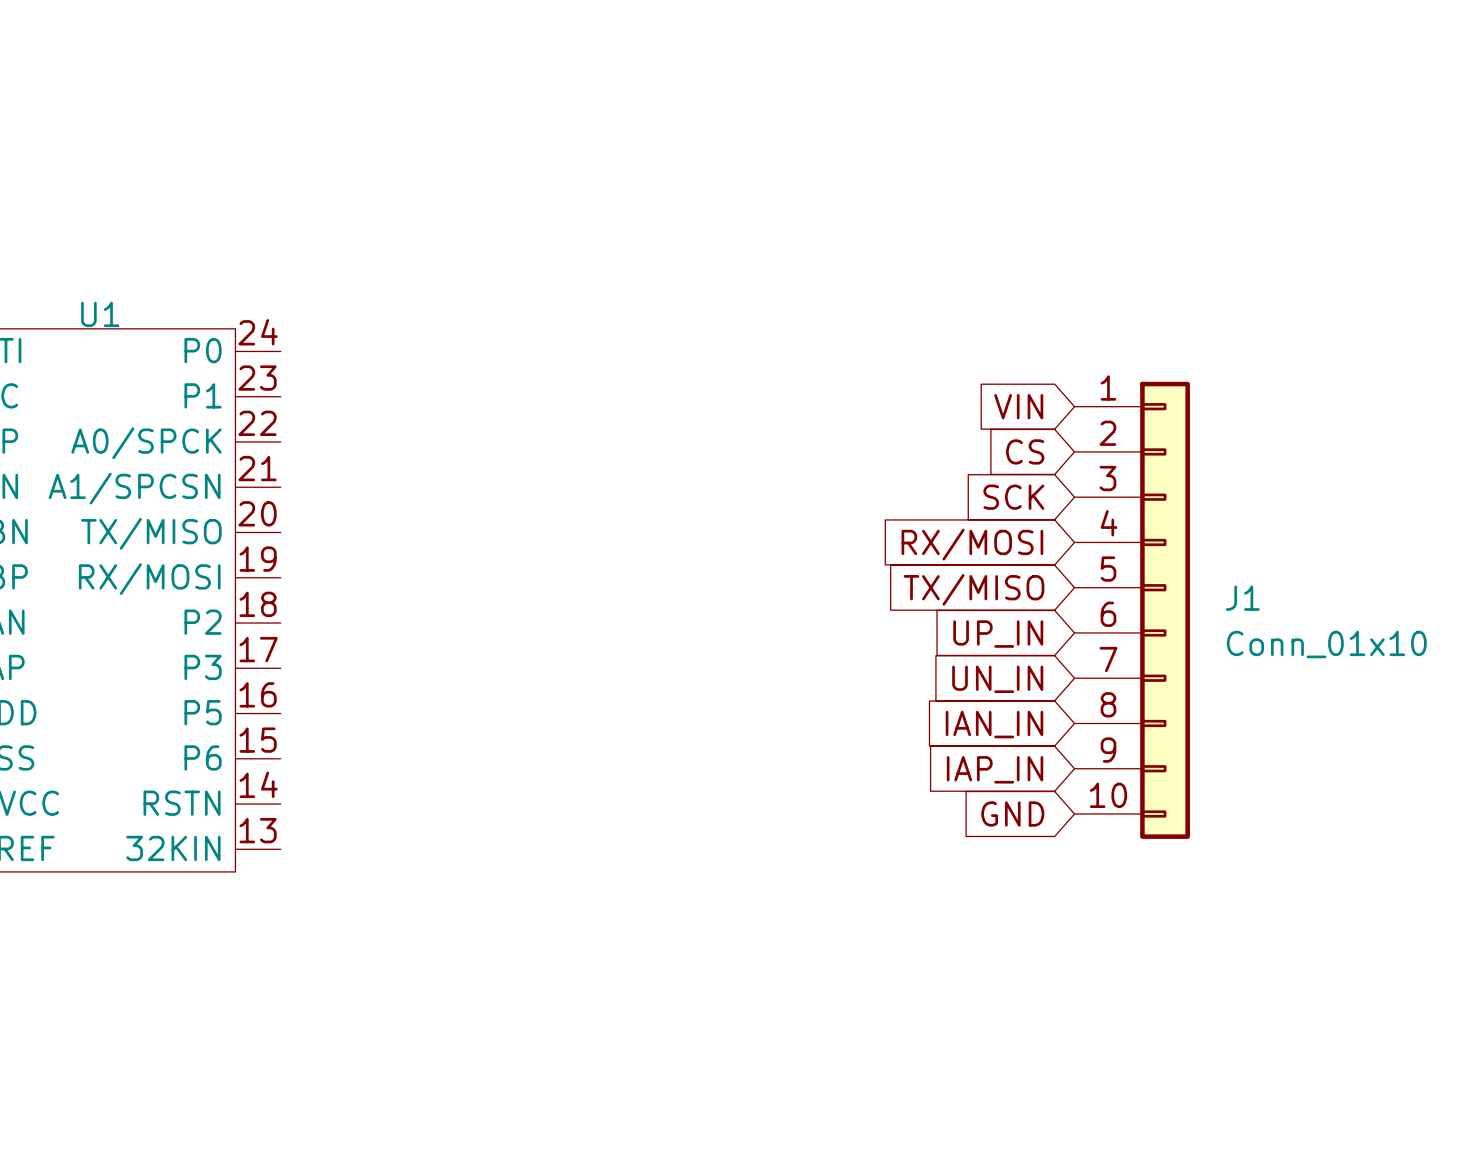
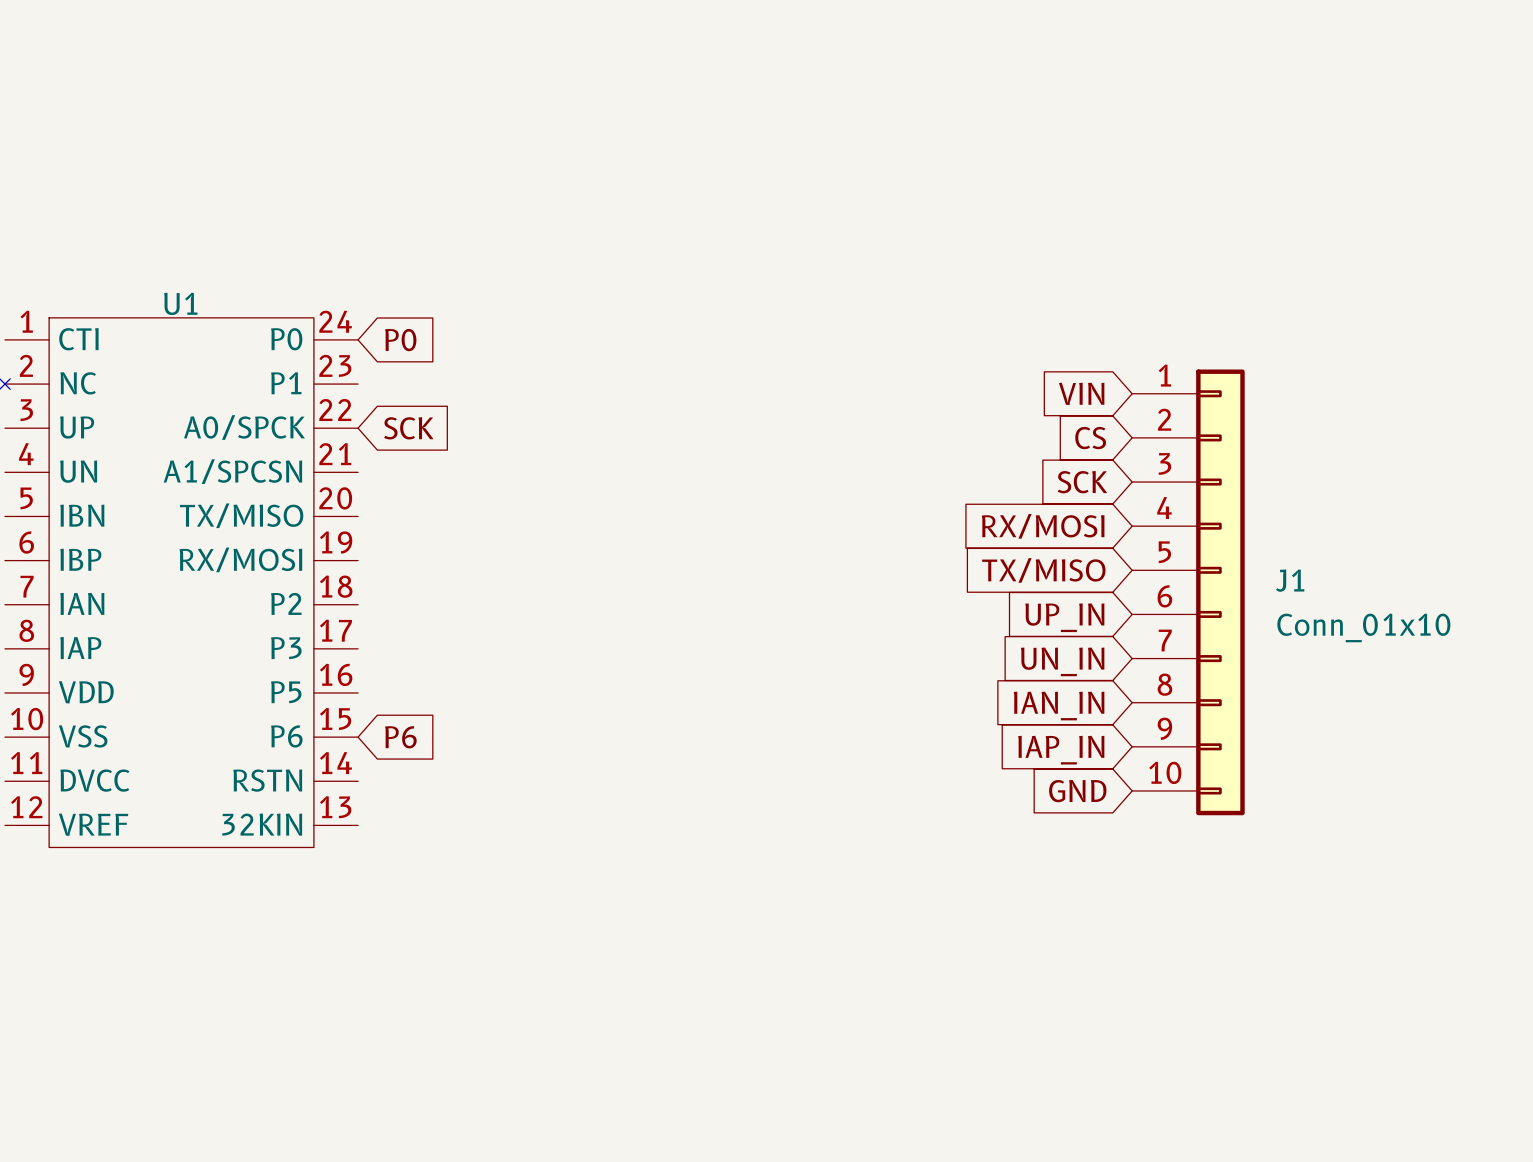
global label: none -> P0 (400, 340)
global label: none -> SCK (408, 428)
global label: none -> P6 (400, 737)

